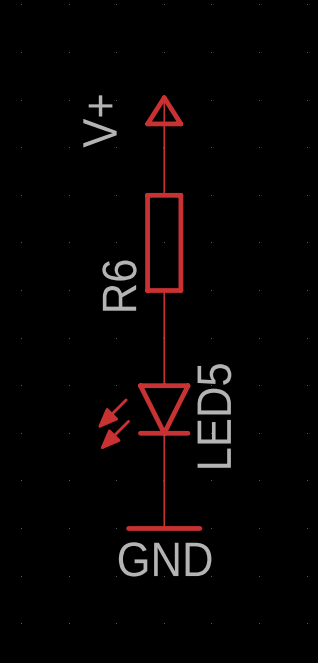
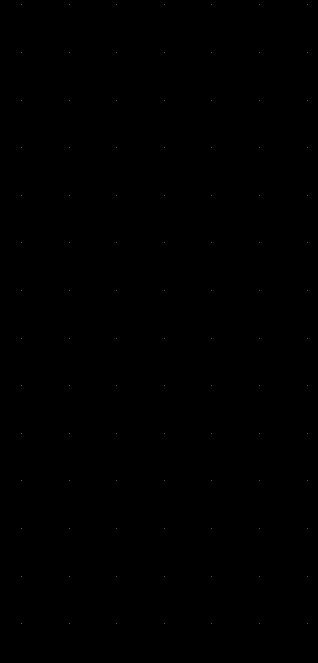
power symbol: V+ (164, 121) -> none
R6: (164, 242) -> none
LED5: (144, 409) -> none
power symbol: GND (164, 505) -> none

